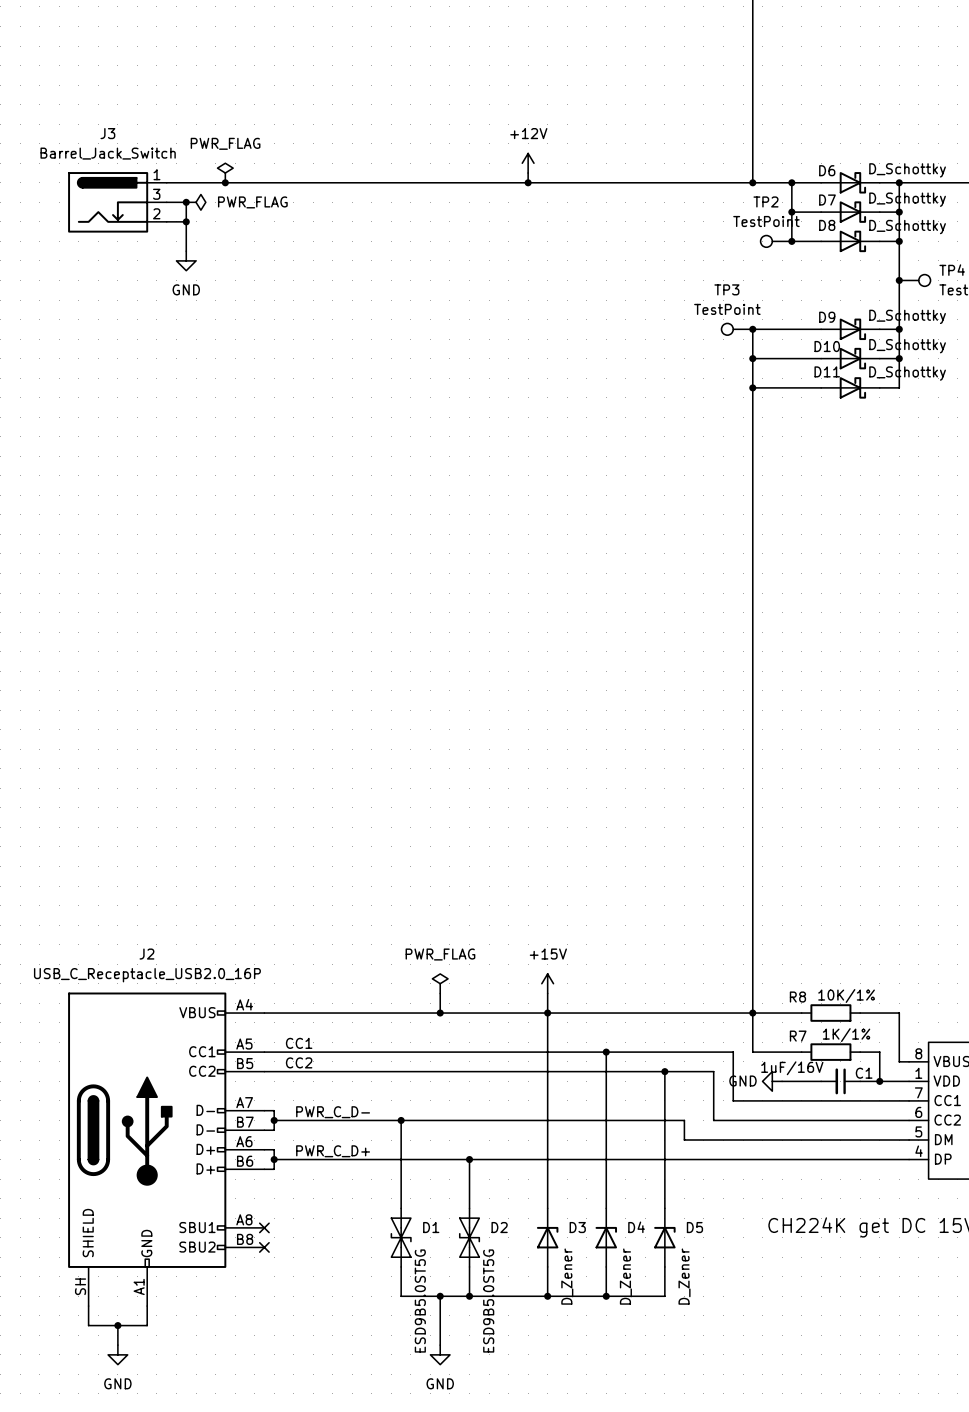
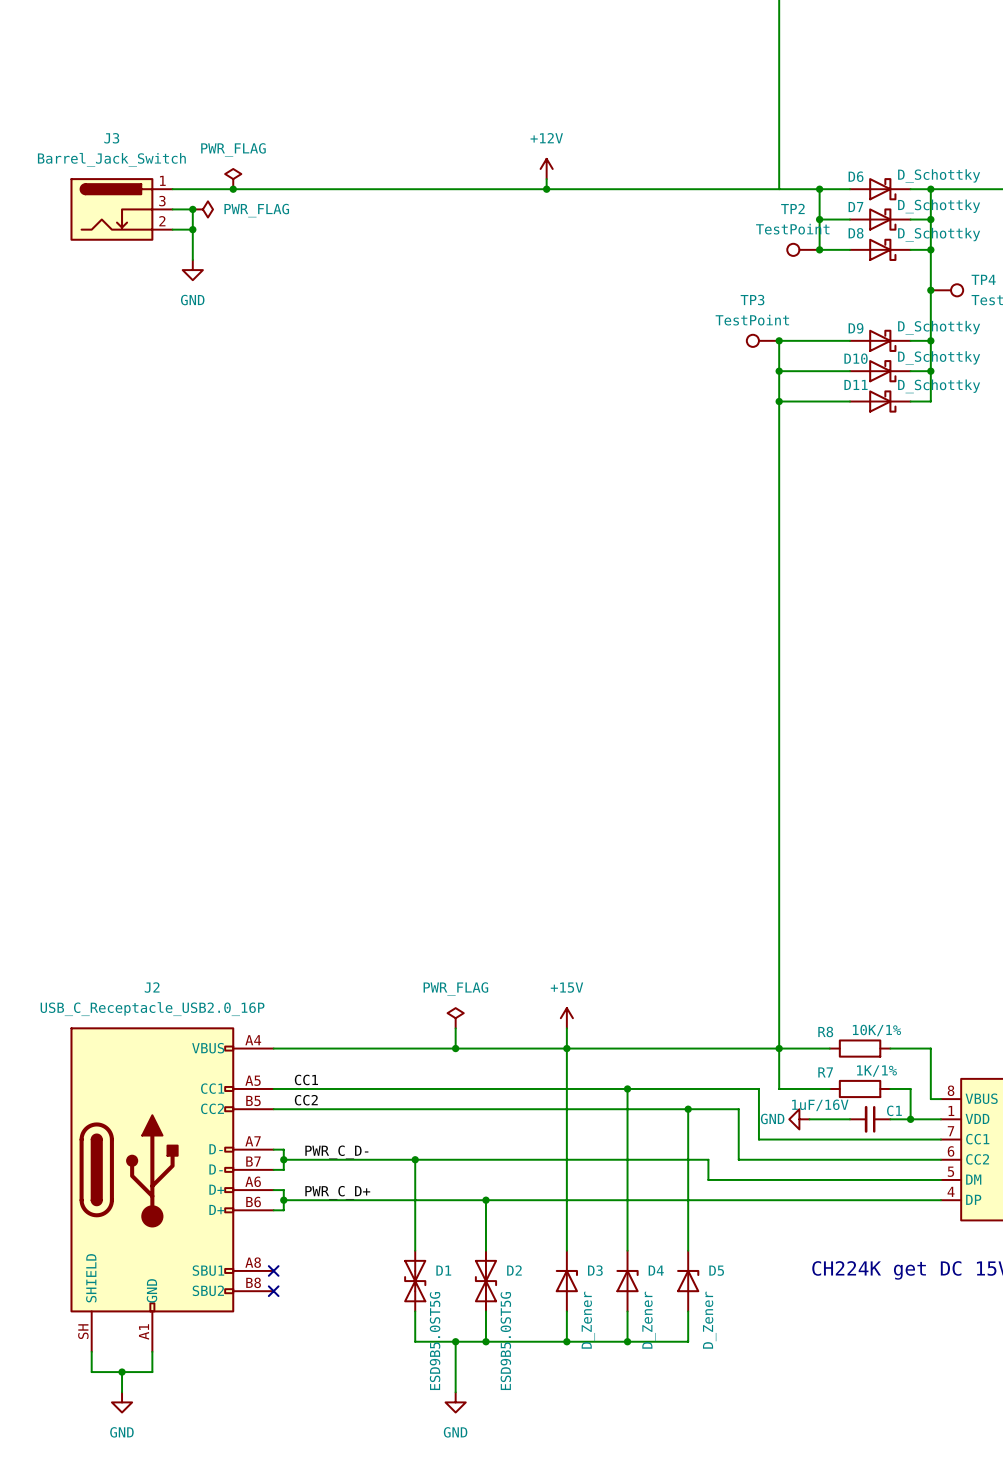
junction: (752, 182) -> none

